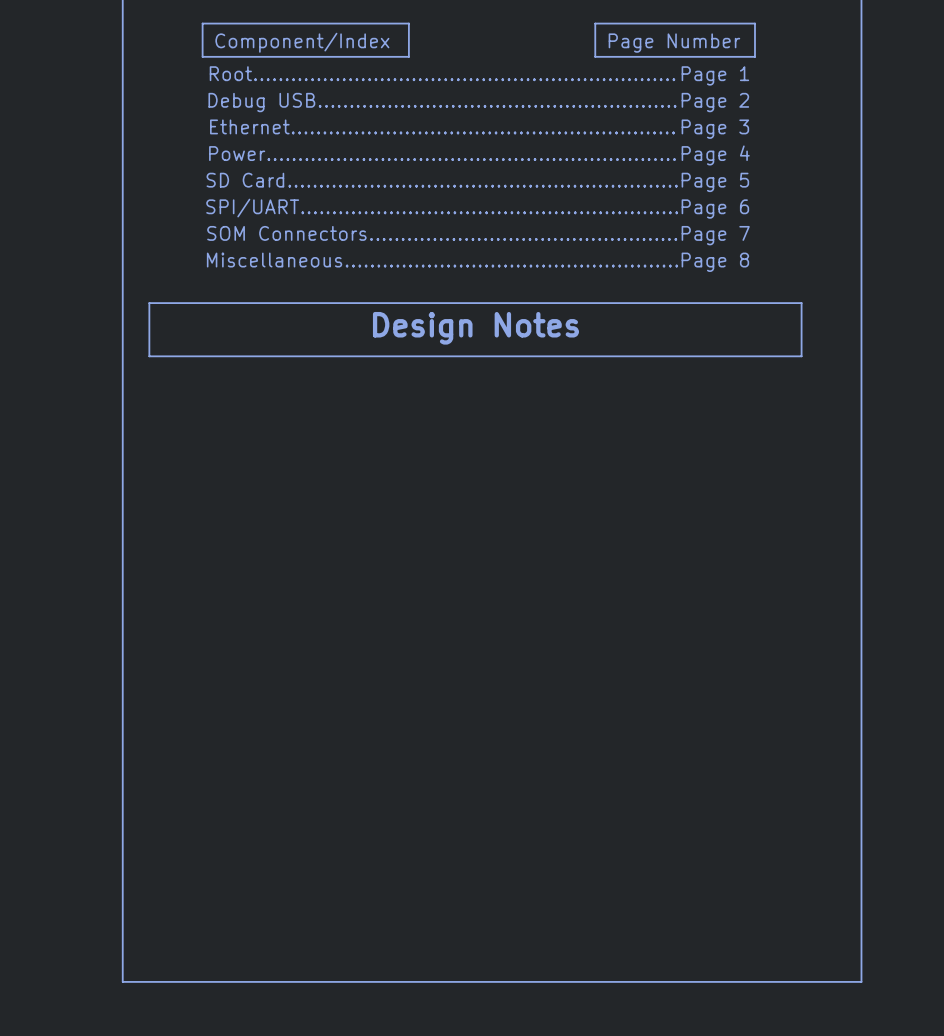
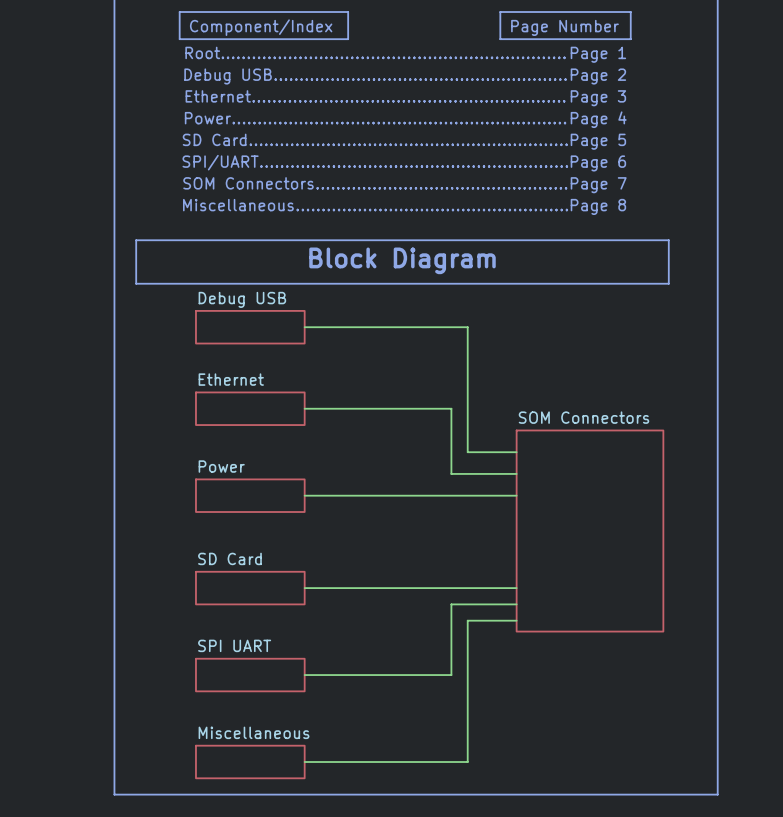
text: Design Notes (475, 328) -> Block Diagram (402, 260)
sheet Debug USB: none -> (250, 327)
wire: none -> (304, 327) (467, 327) (467, 452) (516, 452)
sheet Ethernet: none -> (250, 408)
wire: none -> (304, 408) (451, 408) (451, 473) (516, 473)
sheet Power: none -> (250, 495)
wire: none -> (304, 495) (516, 495)
sheet SOM Connectors: none -> (590, 531)
sheet SD Card: none -> (250, 588)
wire: none -> (304, 588) (516, 588)
wire: none -> (516, 604) (451, 604) (451, 675) (304, 675)
wire: none -> (516, 620) (467, 620) (467, 762) (304, 762)
sheet SPI UART: none -> (250, 675)
sheet Miscellaneous: none -> (250, 762)

